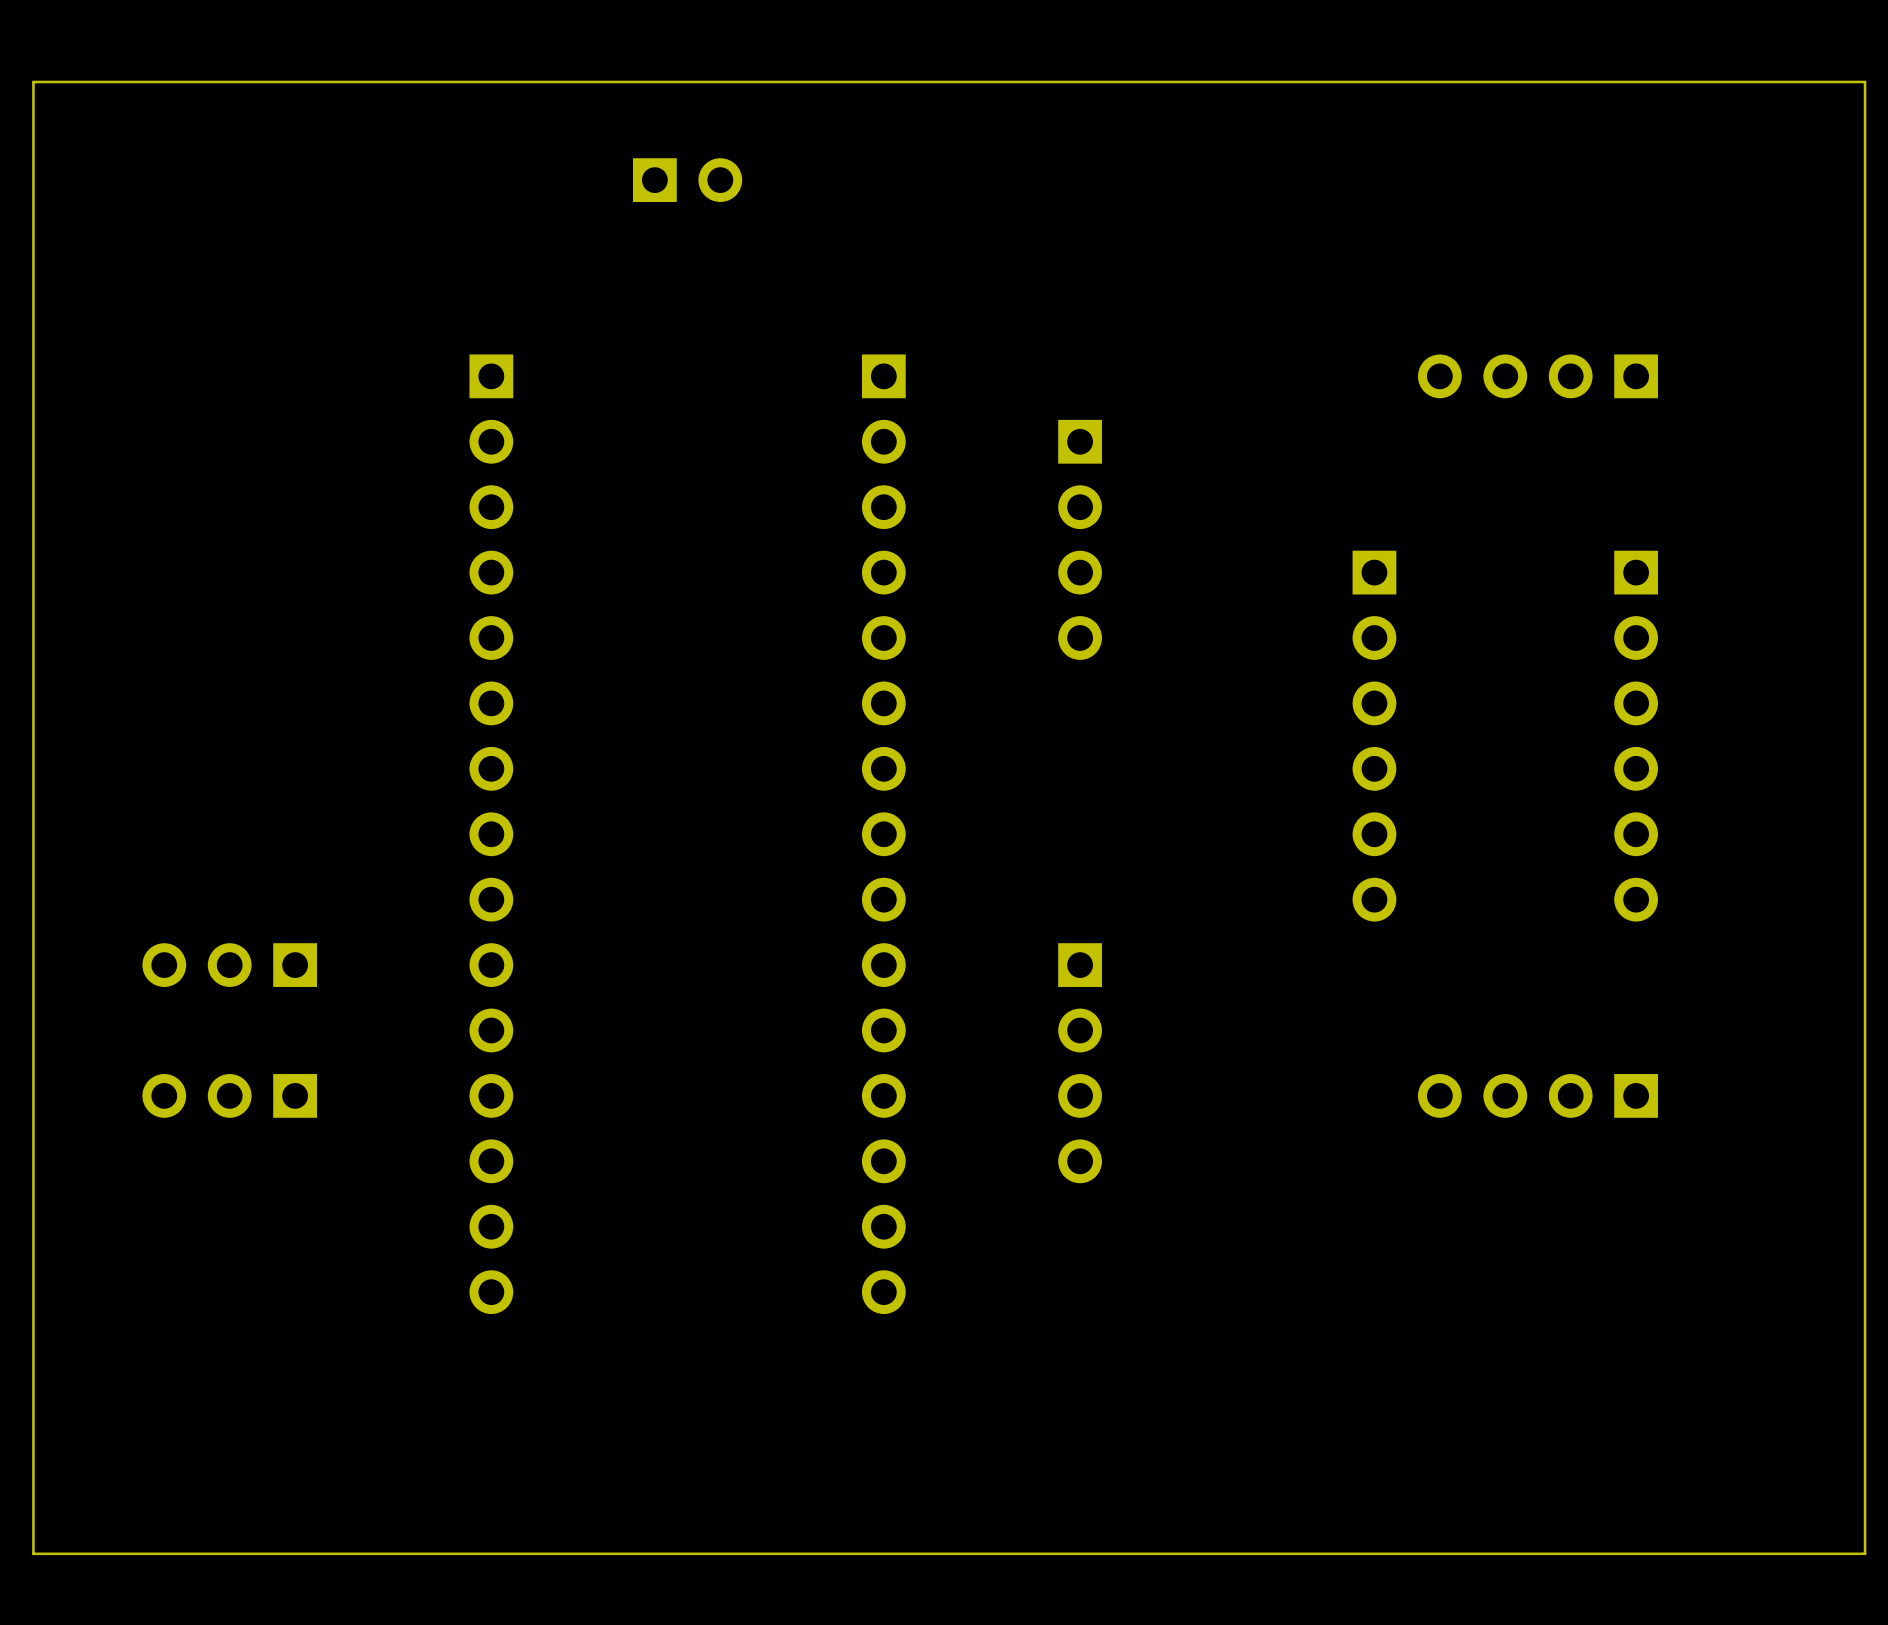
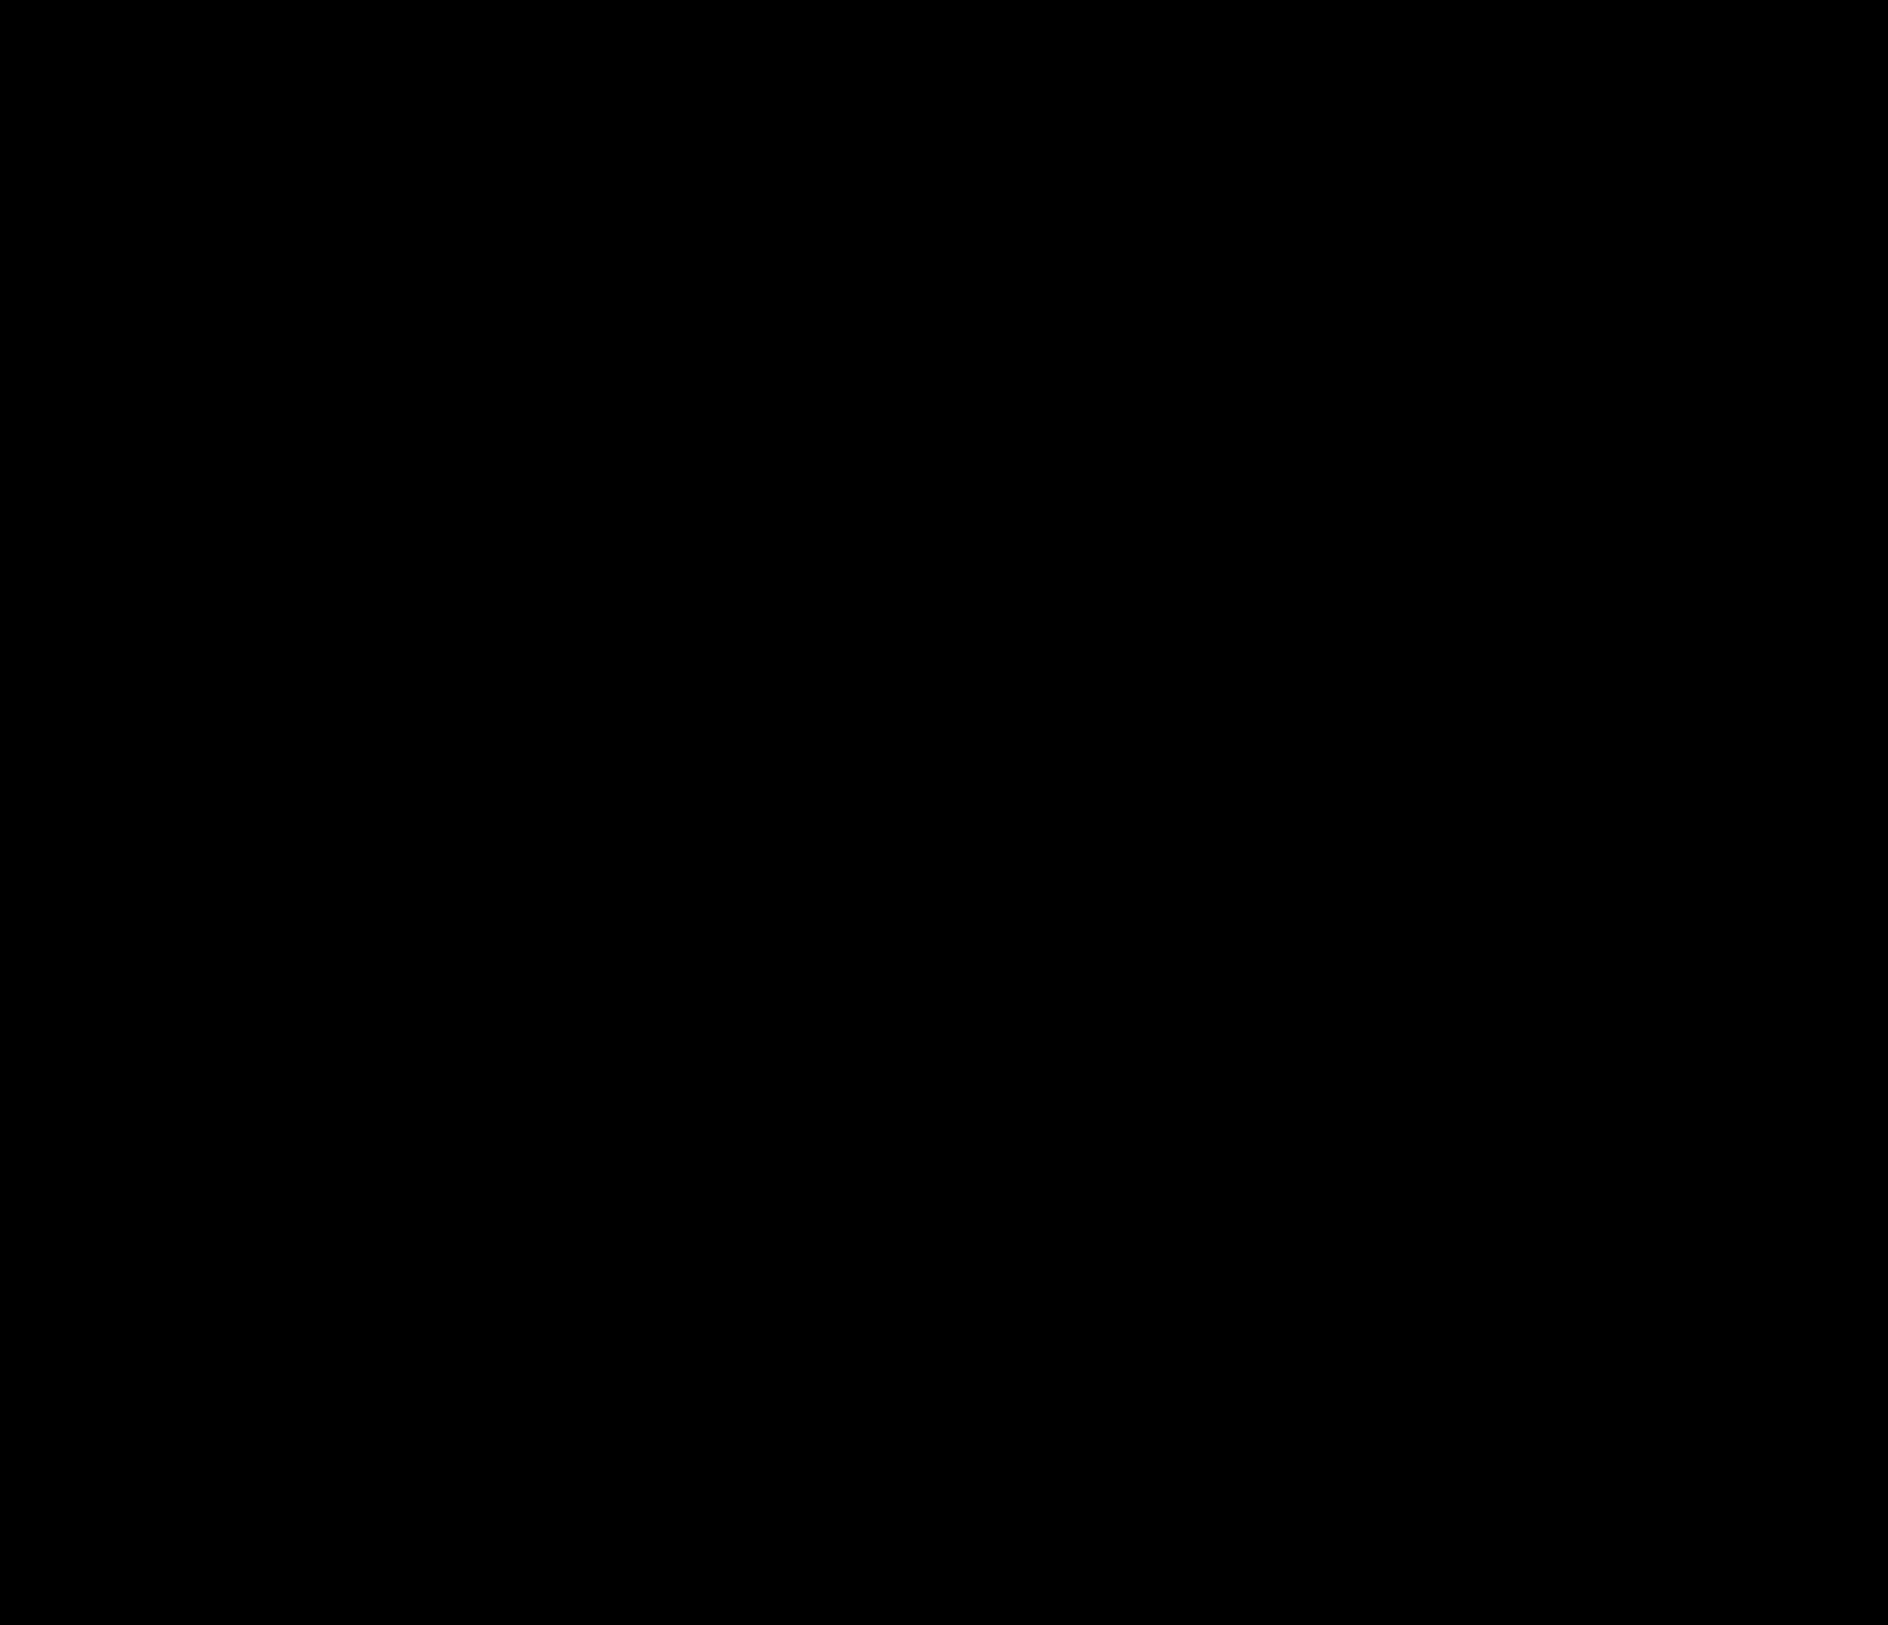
board edge: (1865, 81) (33, 81) (33, 1553) (1865, 1553) (1865, 81) -> none
part: (687, 180) -> none
part: (1537, 376) -> none
part: (1080, 539) -> none
part: (1374, 736) -> none
part: (1636, 736) -> none
part: (491, 834) -> none
part: (883, 834) -> none
part: (229, 965) -> none
part: (1080, 1063) -> none
part: (229, 1095) -> none
part: (1537, 1095) -> none

